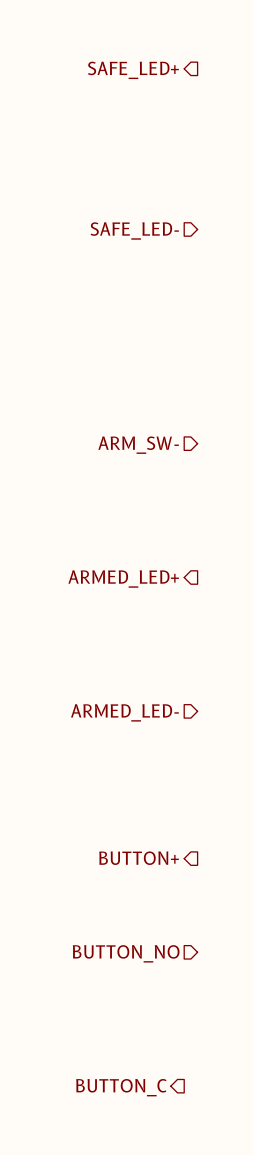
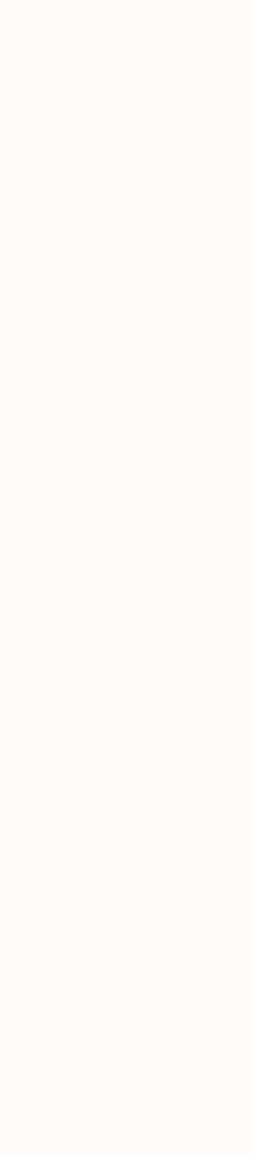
hierarchical label: SAFE_LED+ (133, 70) -> none
hierarchical label: SAFE_LED- (134, 230) -> none
hierarchical label: ARM_SW- (138, 445) -> none
hierarchical label: ARMED_LED+ (123, 579) -> none
hierarchical label: ARMED_LED- (124, 712) -> none
hierarchical label: BUTTON+ (139, 858) -> none
hierarchical label: BUTTON_NO (126, 953) -> none
hierarchical label: BUTTON_C (121, 1087) -> none

